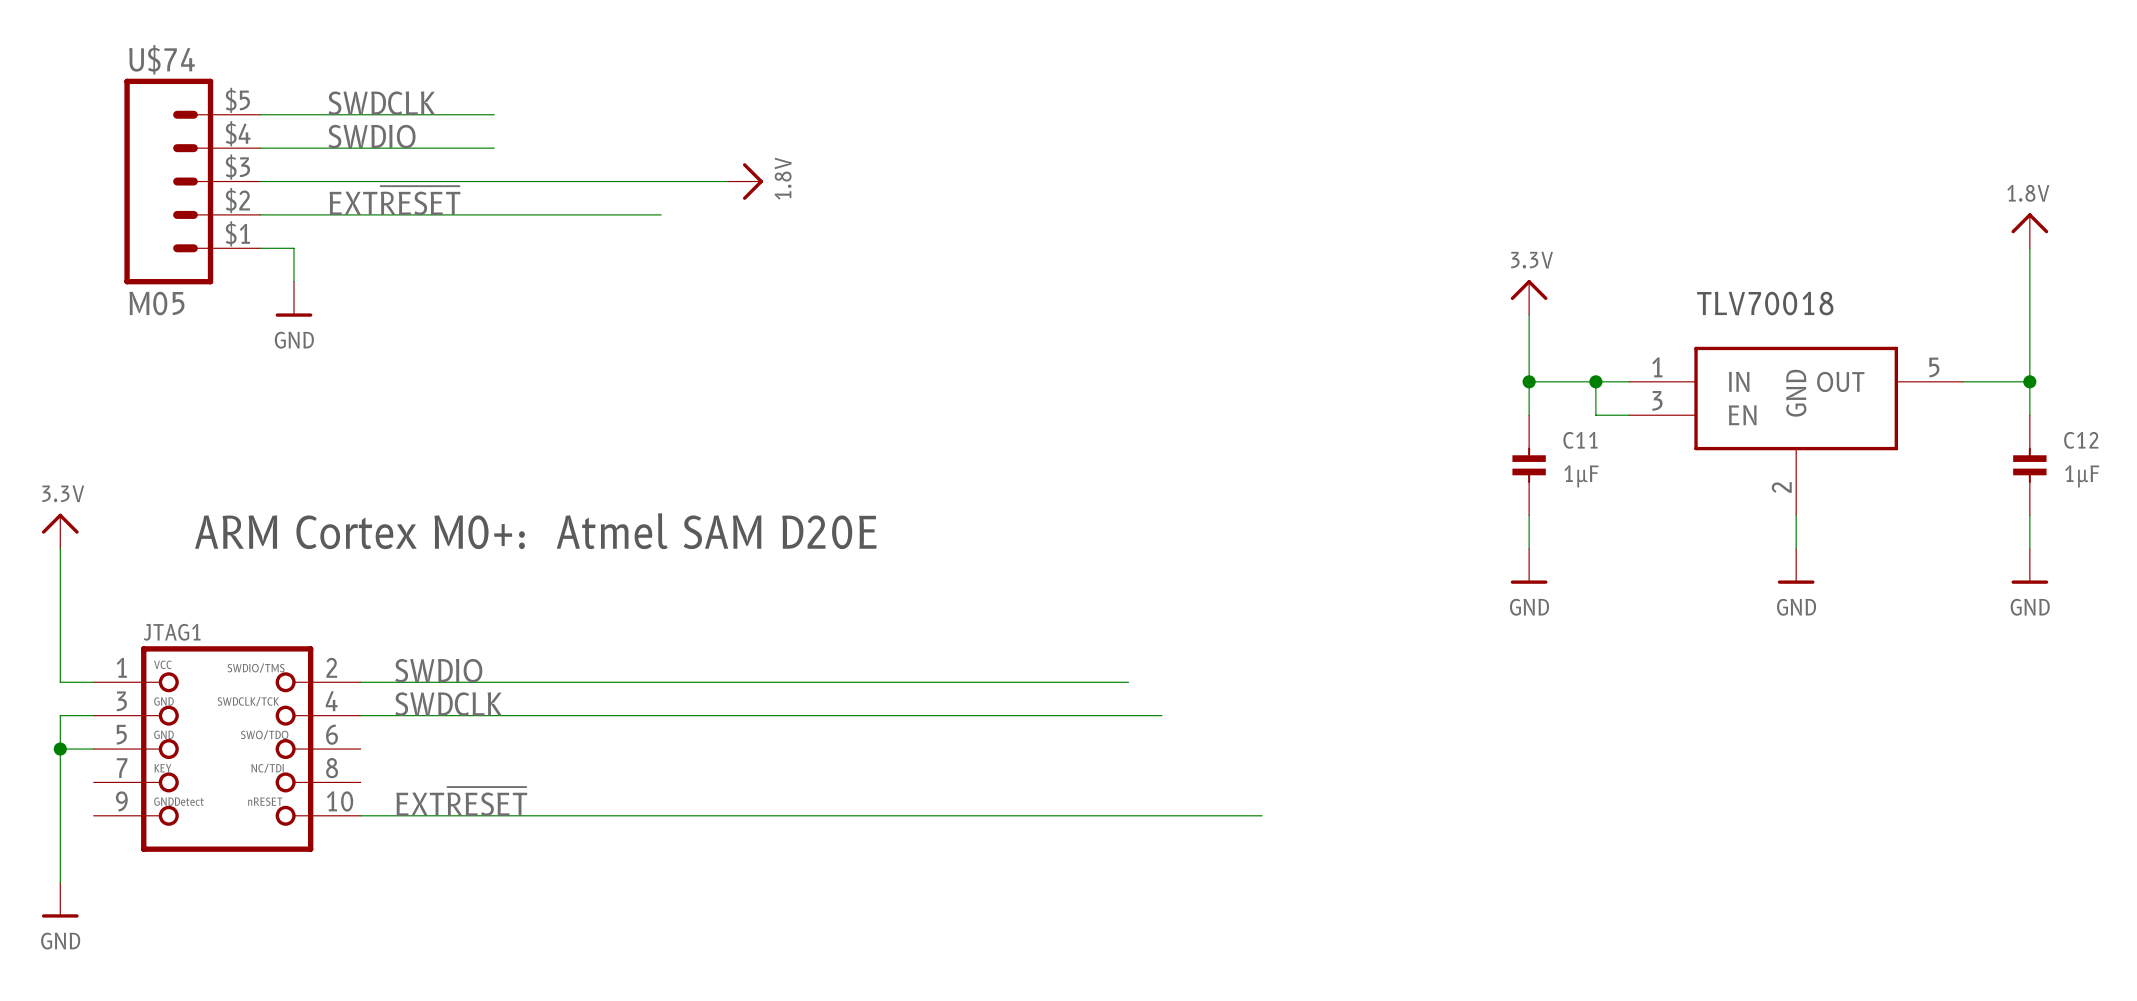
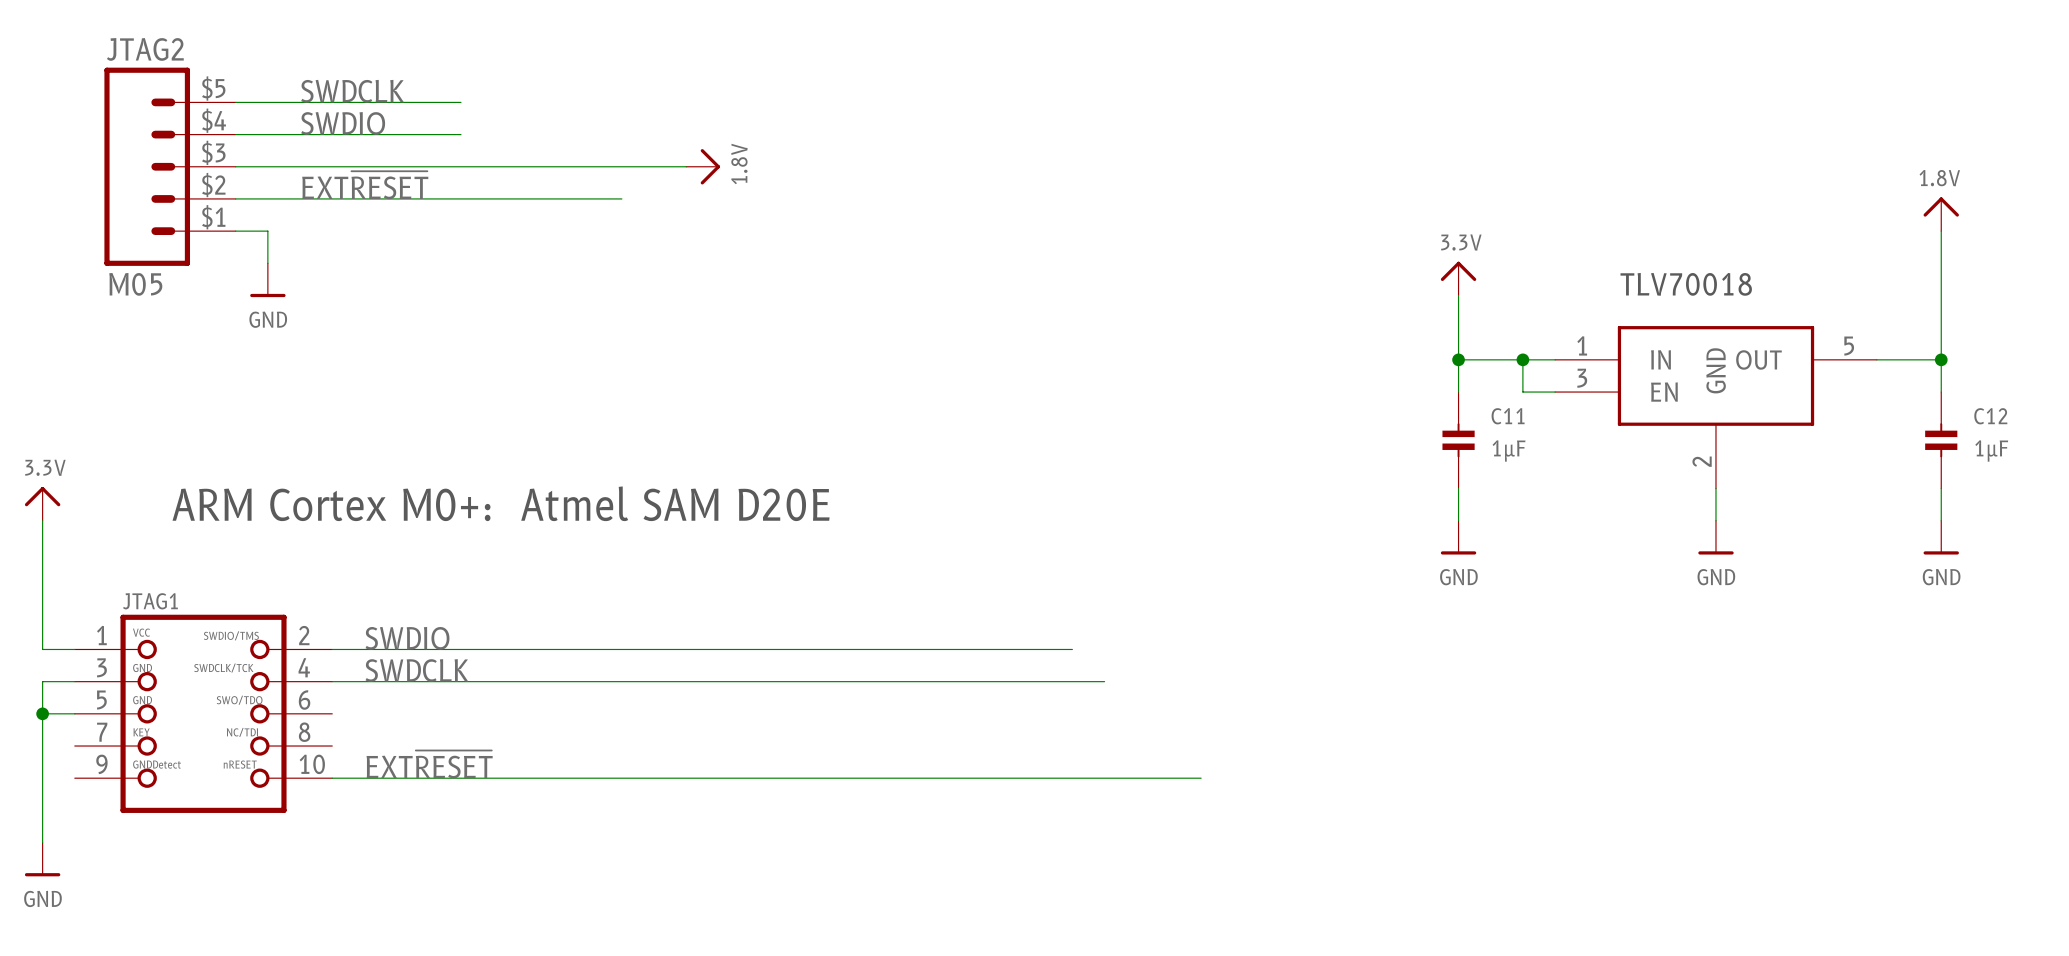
U$74 name: U$74 (161, 59) -> JTAG2 (145, 49)

